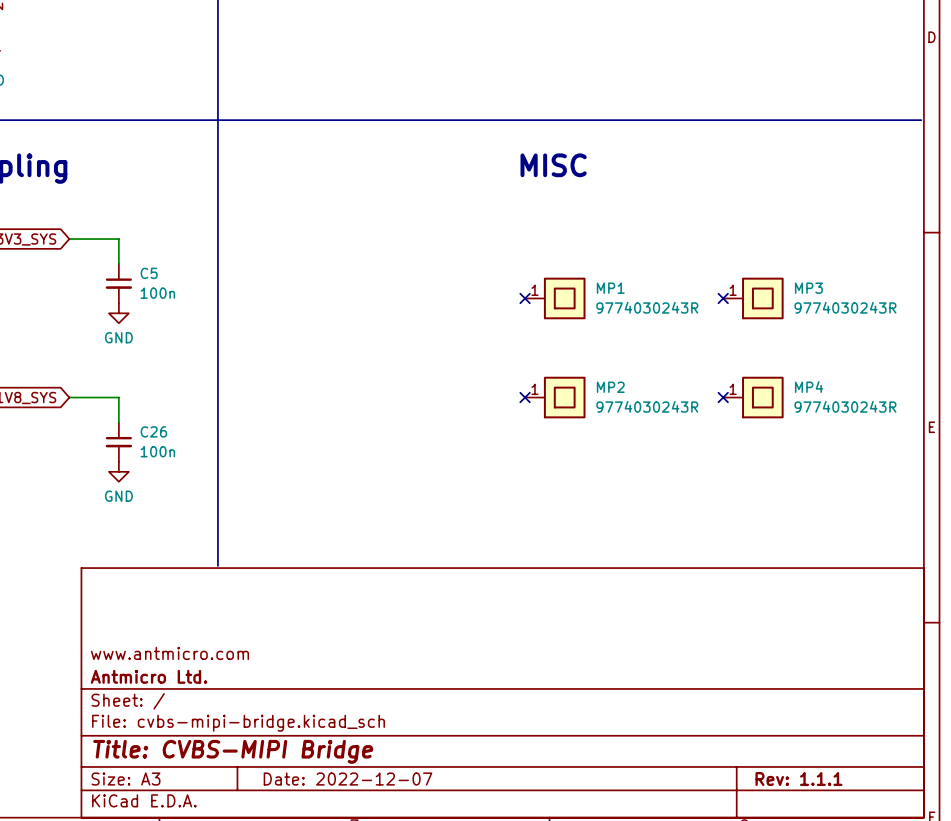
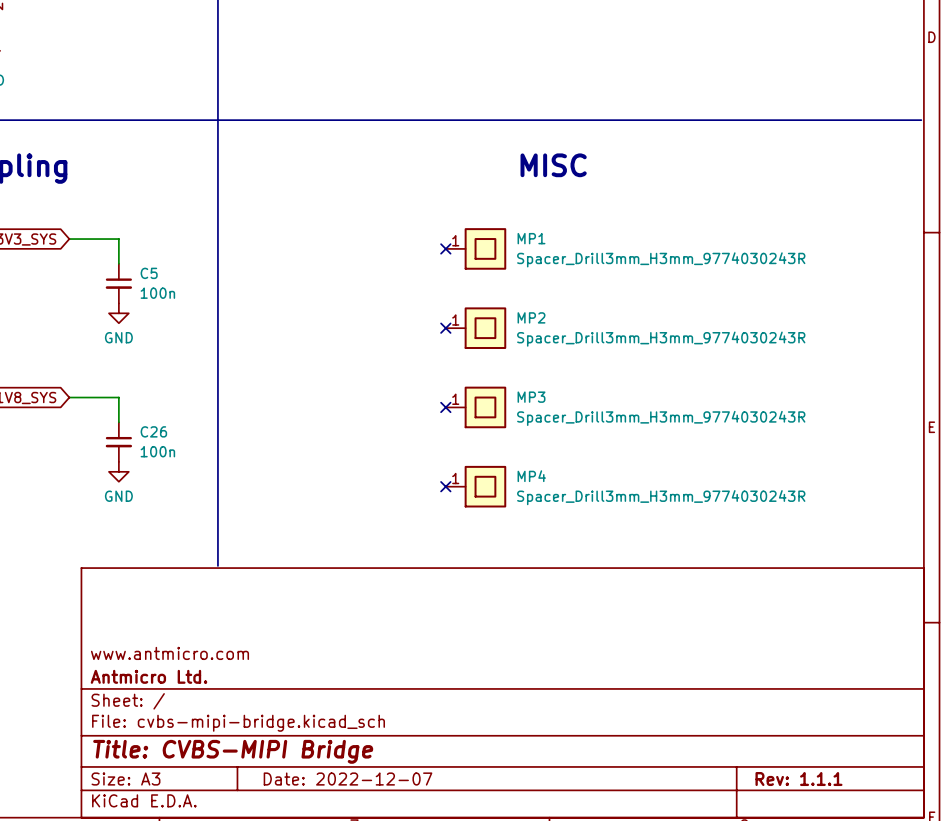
no-connect mark: none -> (445, 248)
MP1 value: none -> Spacer_Drill3mm_H3mm_9774030243R (661, 259)
no-connect mark: (525, 298) -> none
MP1 position: (555, 298) -> (476, 248)
no-connect mark: (723, 298) -> none
MP3 position: (753, 298) -> (476, 407)
MP1 text: 9774030243R (647, 307) -> none
MP3 text: 9774030243R (845, 307) -> none
no-connect mark: none -> (445, 328)
MP2 value: none -> Spacer_Drill3mm_H3mm_9774030243R (661, 339)
no-connect mark: (525, 397) -> none
MP2 position: (555, 397) -> (476, 328)
no-connect mark: (723, 397) -> none
MP4 position: (753, 397) -> (476, 486)
MP2 text: 9774030243R (647, 406) -> none
MP4 text: 9774030243R (845, 406) -> none
no-connect mark: none -> (445, 407)
MP3 value: none -> Spacer_Drill3mm_H3mm_9774030243R (661, 418)
no-connect mark: none -> (445, 486)
MP4 value: none -> Spacer_Drill3mm_H3mm_9774030243R (661, 497)

